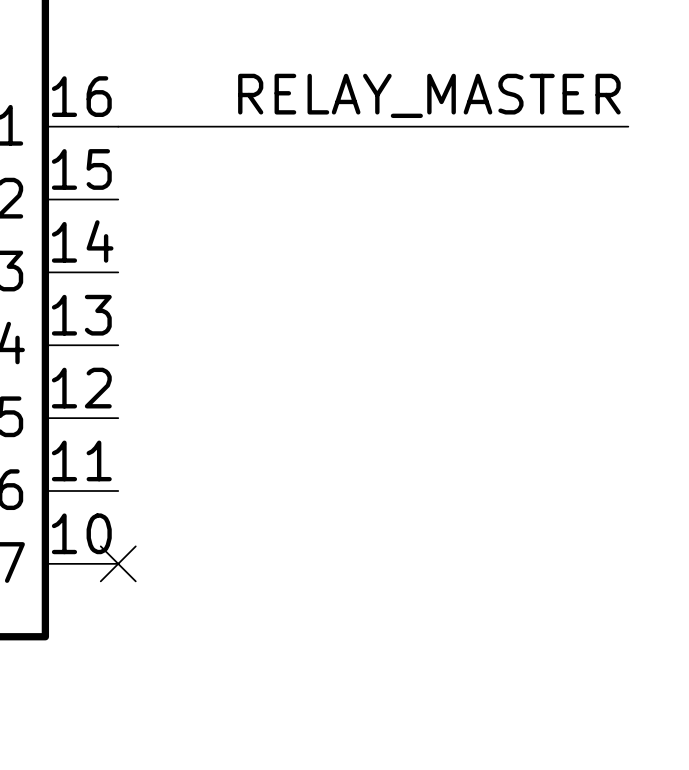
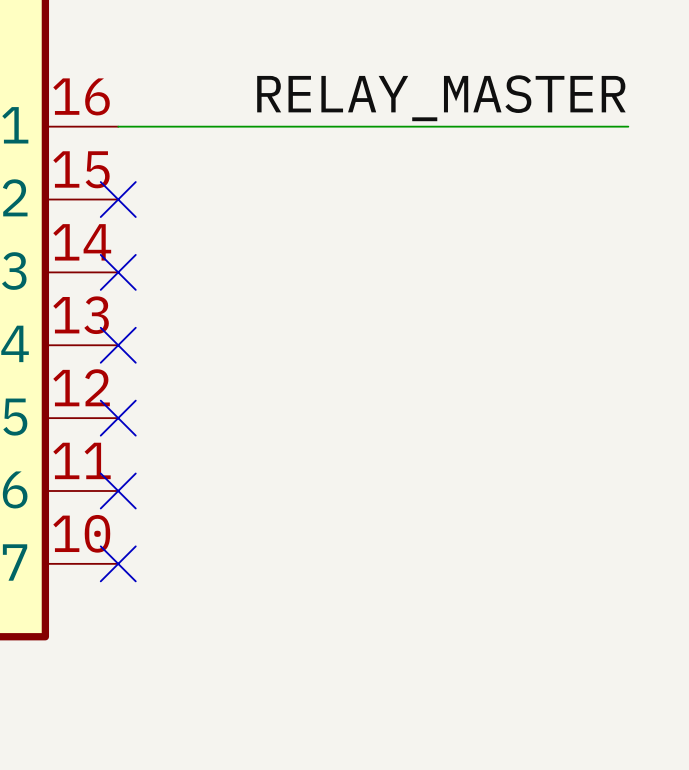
no-connect mark: none -> (118, 199)
no-connect mark: none -> (118, 272)
no-connect mark: none -> (118, 345)
no-connect mark: none -> (118, 418)
no-connect mark: none -> (118, 491)

